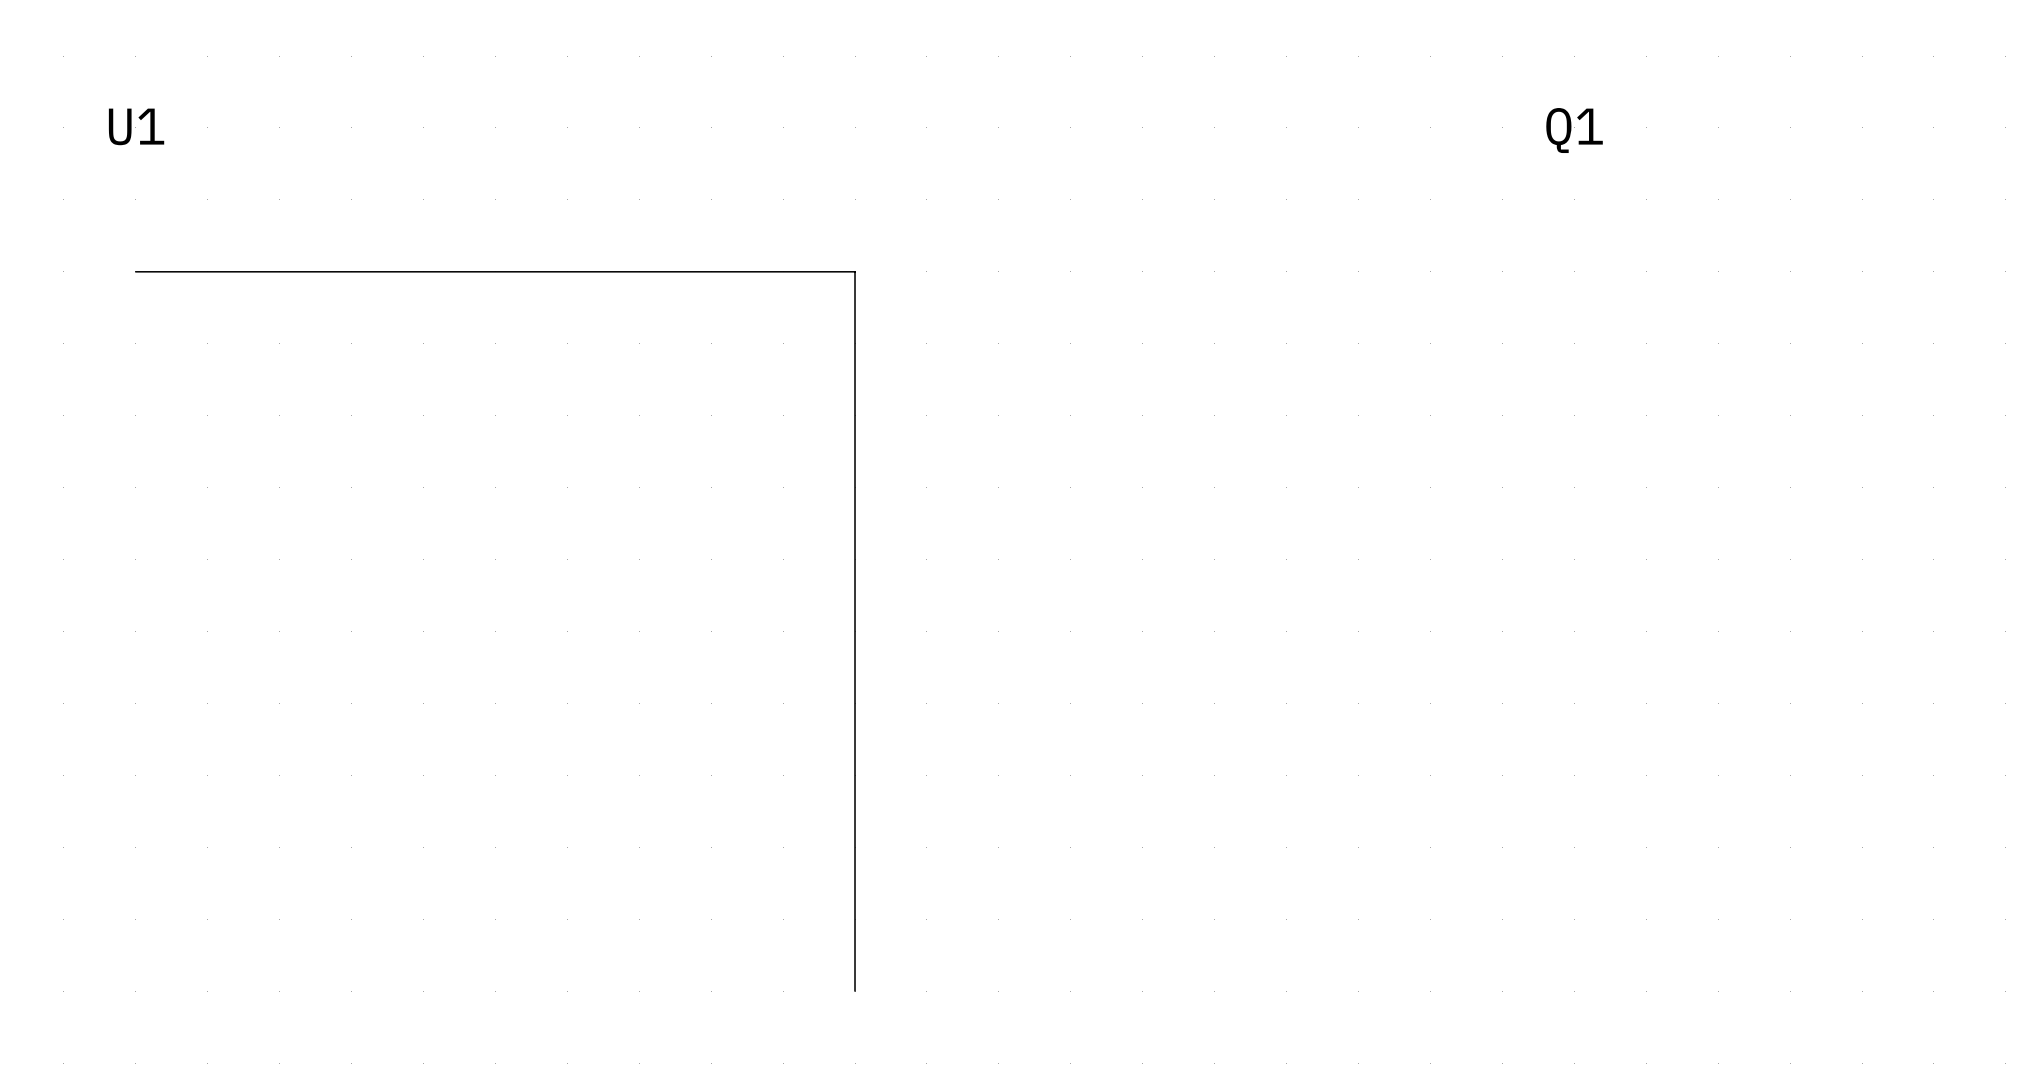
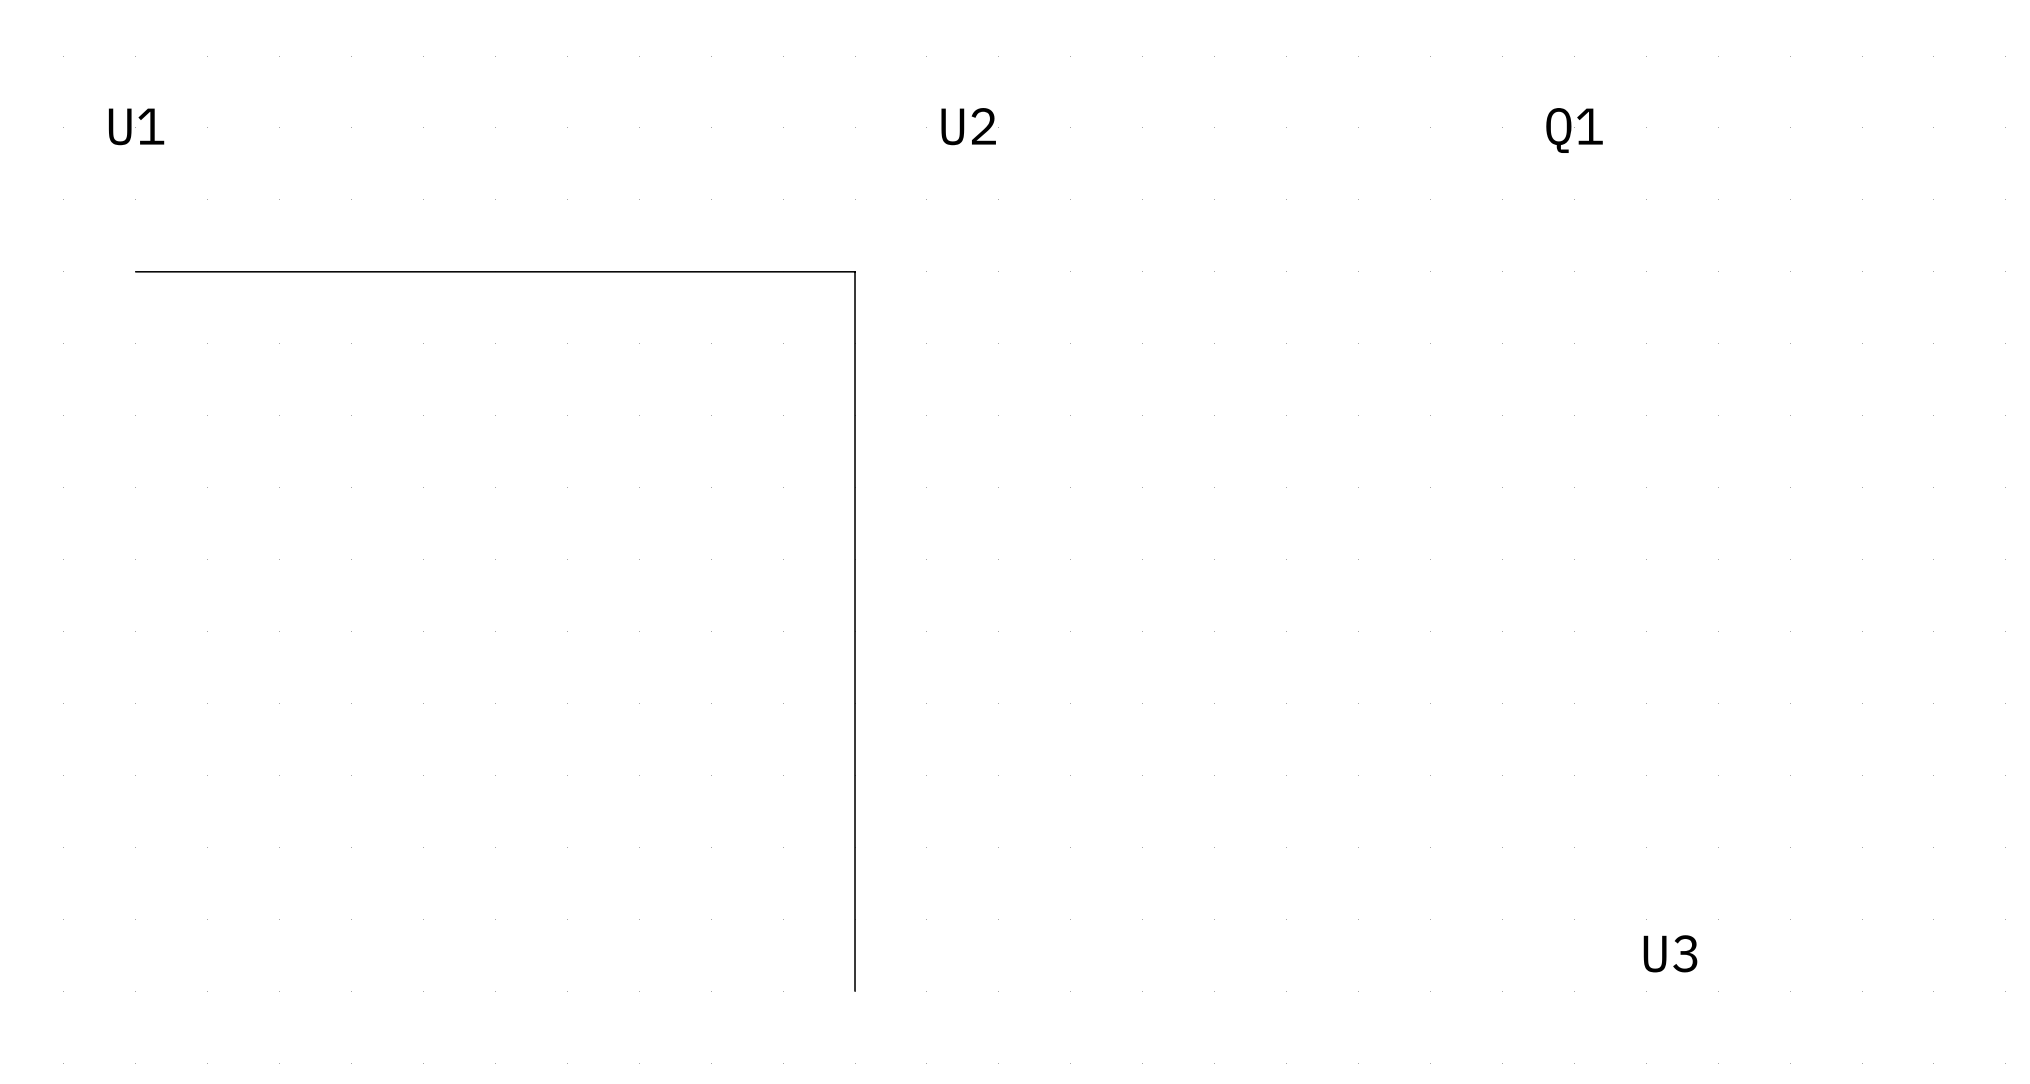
U2: none -> (968, 126)
U3: none -> (1670, 953)

